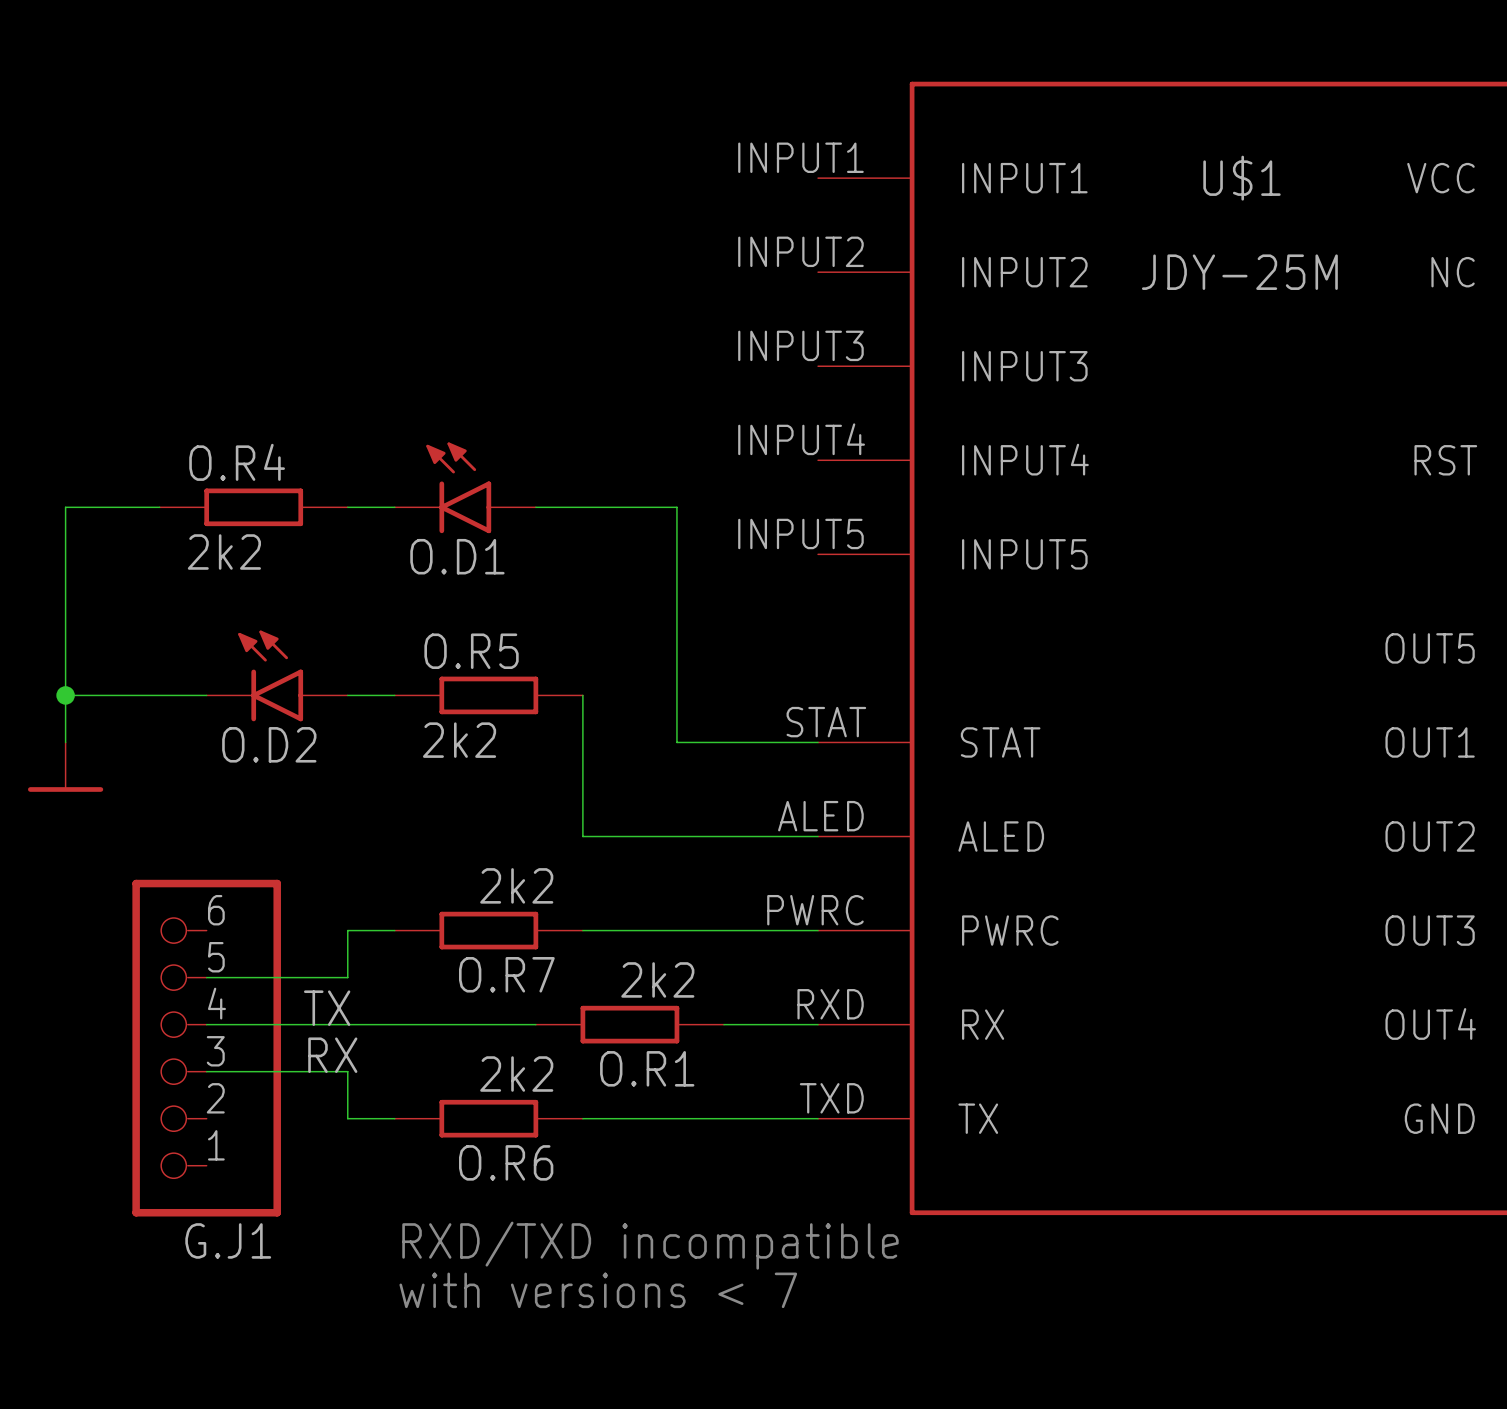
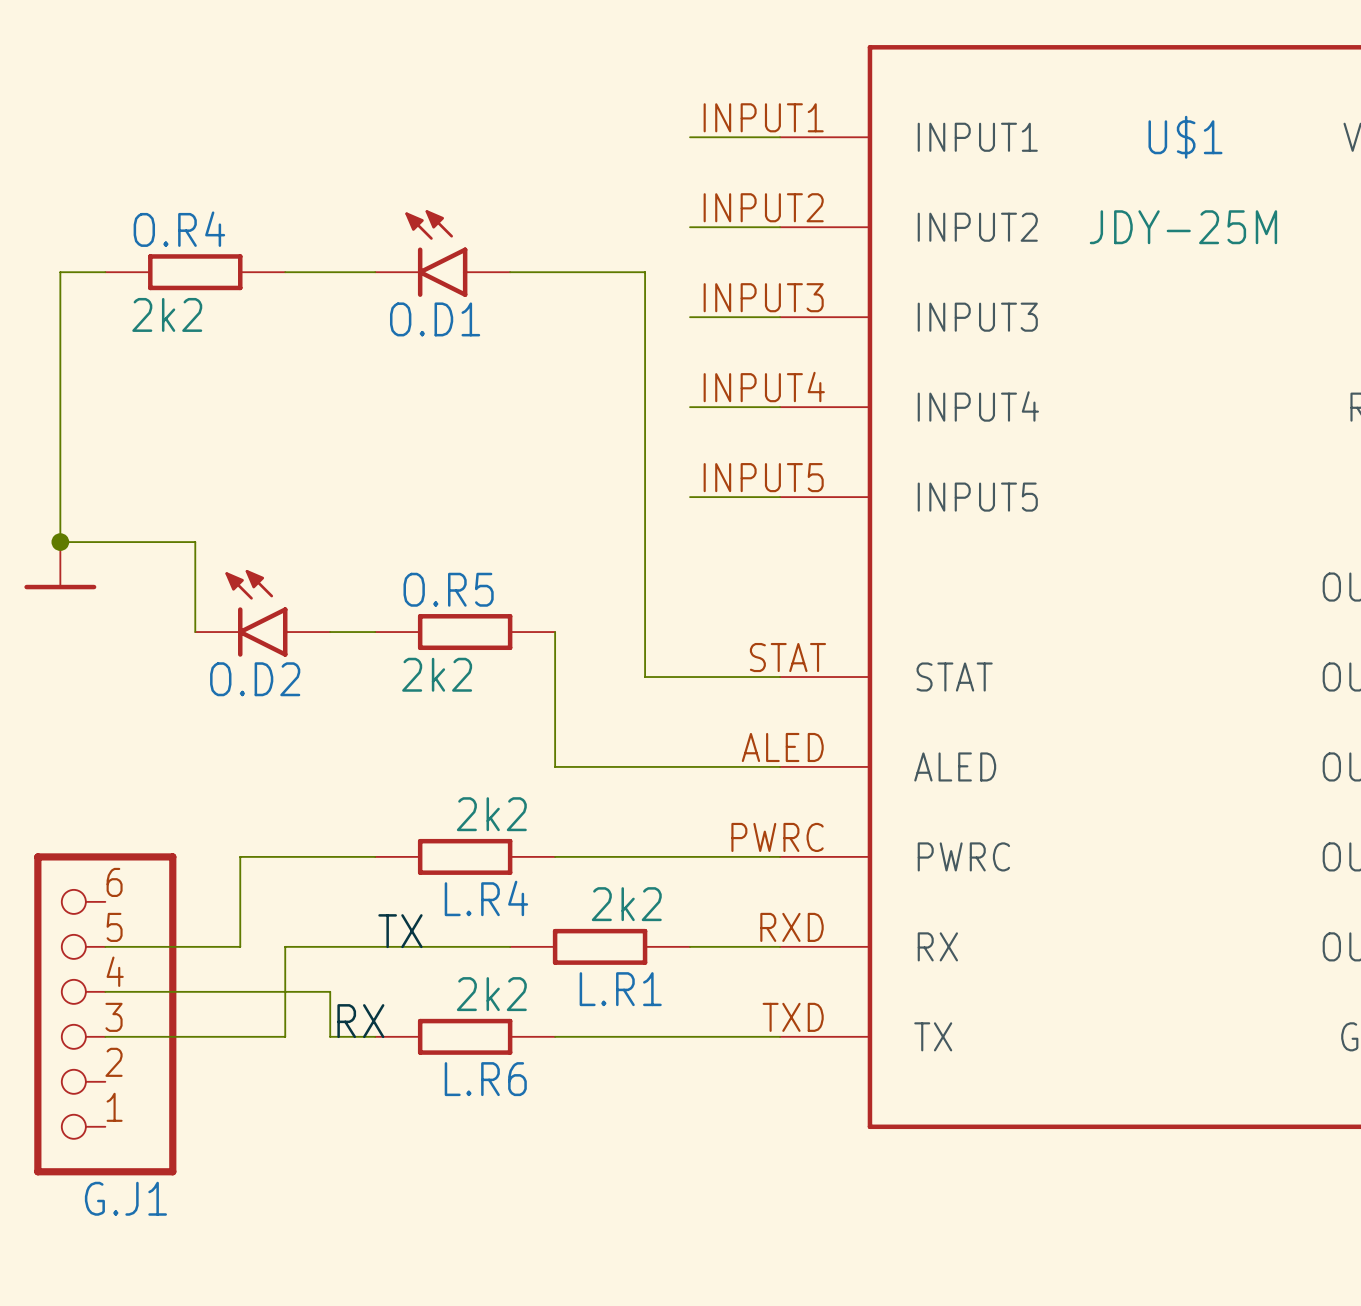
wire: none -> (690, 137) (780, 137)
wire: none -> (690, 227) (780, 227)
wire: none -> (285, 272) (375, 272)
wire: none -> (690, 317) (780, 317)
wire: none -> (690, 407) (780, 407)
O.D1 position: (465, 487) -> (442, 253)
wire: (65, 507) (159, 507) -> (60, 452) (60, 272) (105, 272)
O.R4 position: (253, 507) -> (195, 272)
wire: (347, 507) (394, 507) -> none
wire: (535, 507) (676, 507) -> (510, 272) (645, 272) (645, 452)
wire: none -> (690, 497) (780, 497)
wire: (65, 601) (65, 742) -> none
wire: (65, 695) (206, 695) -> (60, 542) (195, 542) (195, 632)
junction position: (65, 695) -> (60, 542)
power symbol position: (65, 767) -> (60, 565)
wire: (347, 930) (347, 977) (206, 977) -> (330, 856) (240, 856) (240, 946)
O.R7 name: O.R7 (506, 974) -> L.R4 (486, 898)
label position: TX (327, 1008) -> TX (400, 931)
wire: none -> (105, 946) (195, 946)
wire: (253, 1024) (300, 1024) -> (105, 1036) (285, 1036) (285, 946)
G.J1 position: (206, 1048) -> (105, 1014)
label position: RX (332, 1055) -> RX (360, 1021)
O.R1 name: O.R1 (647, 1068) -> L.R1 (620, 989)
wire: none -> (105, 991) (195, 991)
O.R6 name: O.R6 (506, 1162) -> L.R6 (485, 1079)
text: RXD/TXD incompatible (650, 1245) -> none
text: with versions < 7 (598, 1290) -> none

